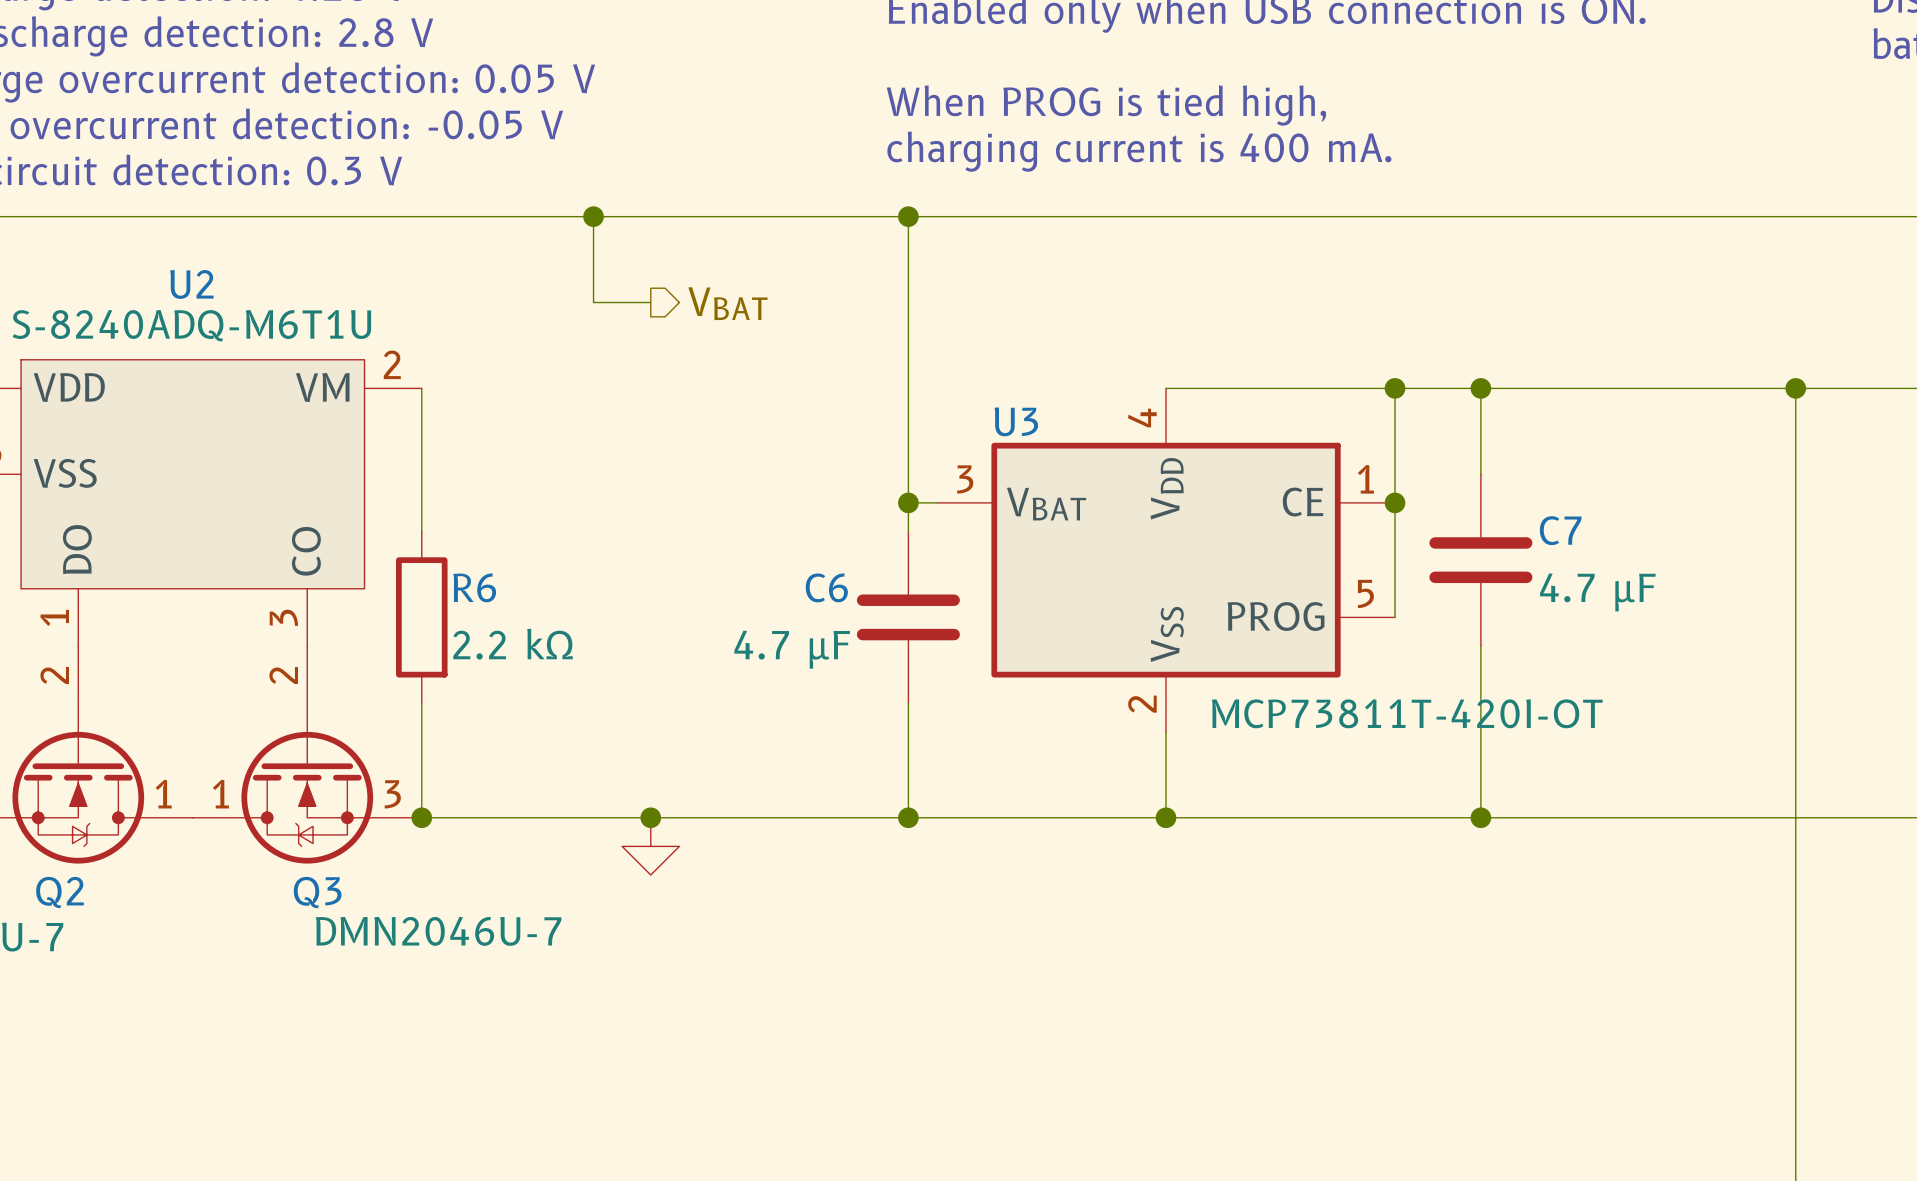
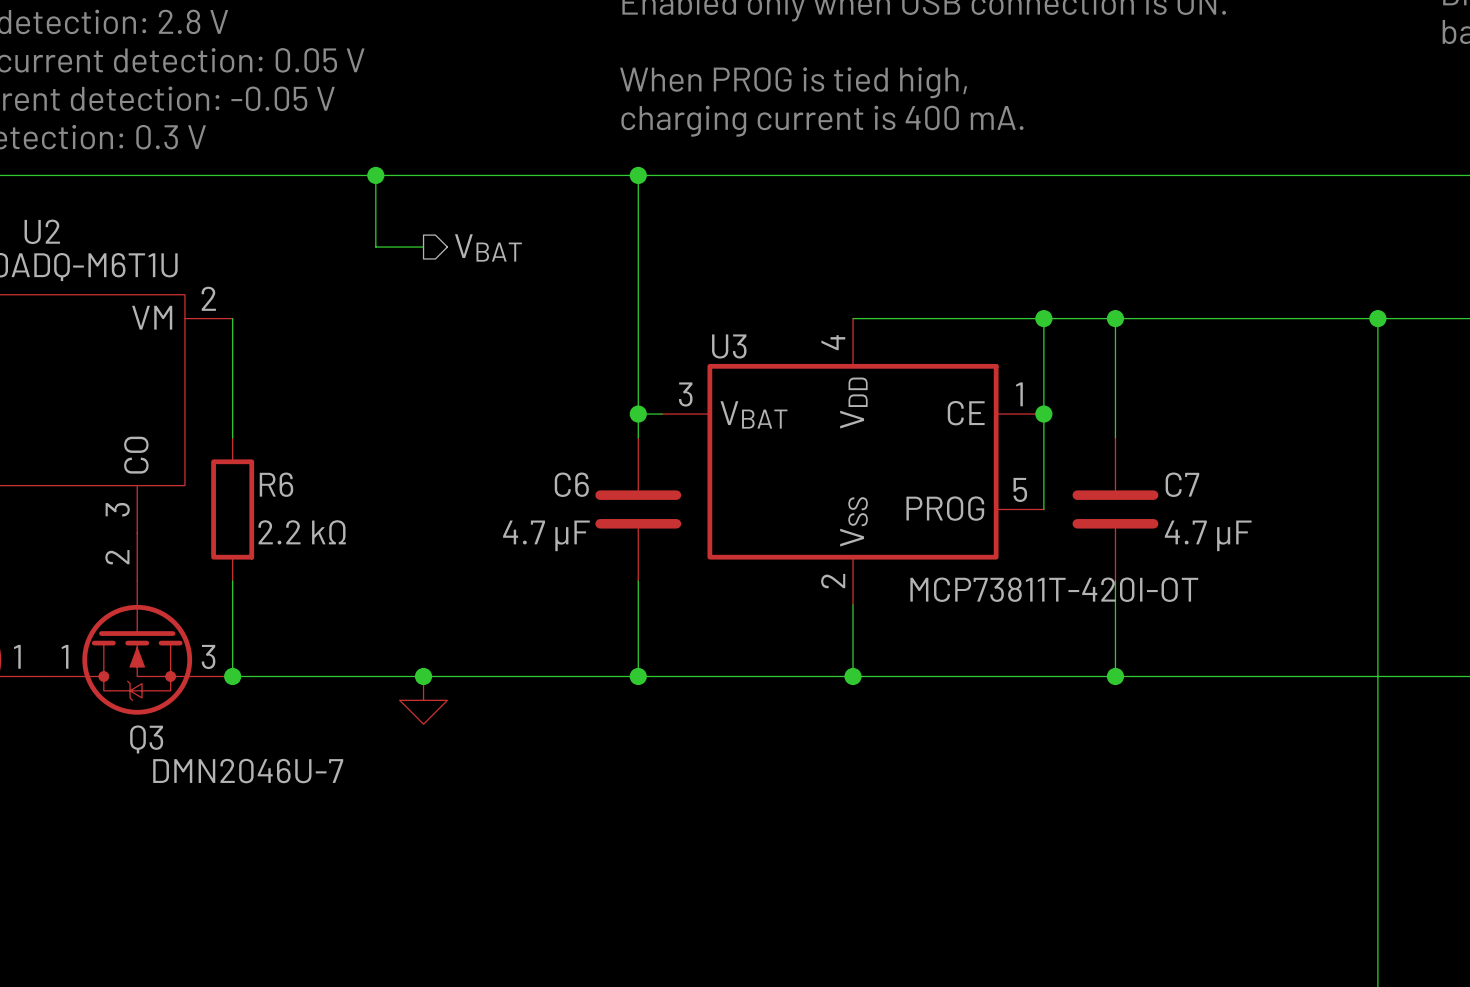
C7 position: (1480, 560) -> (1115, 509)

